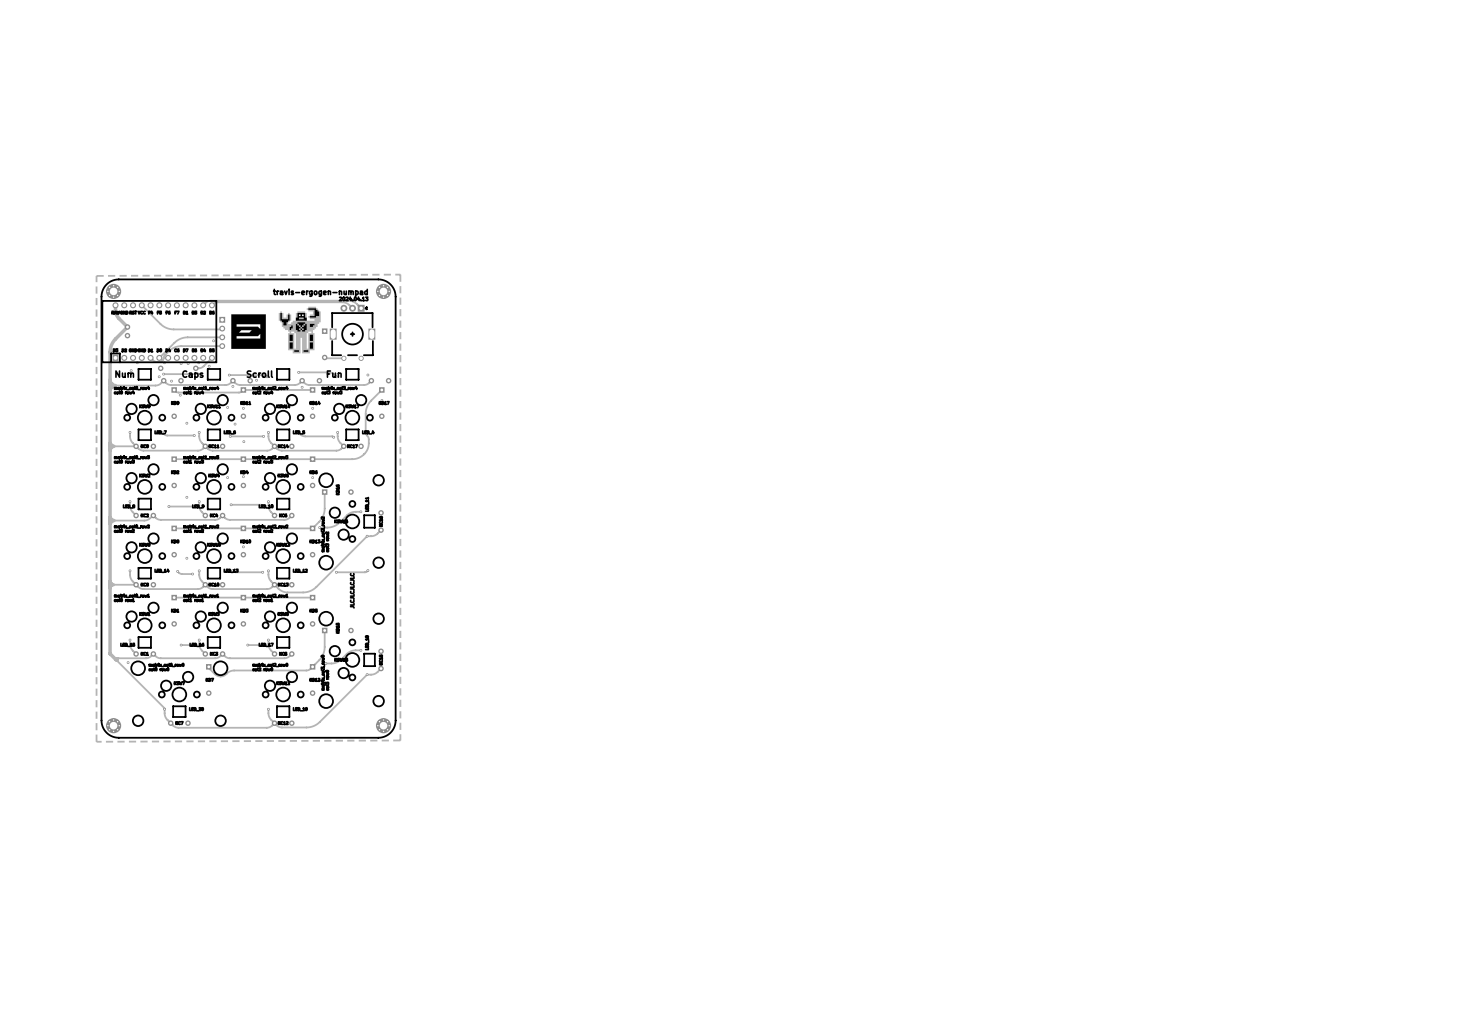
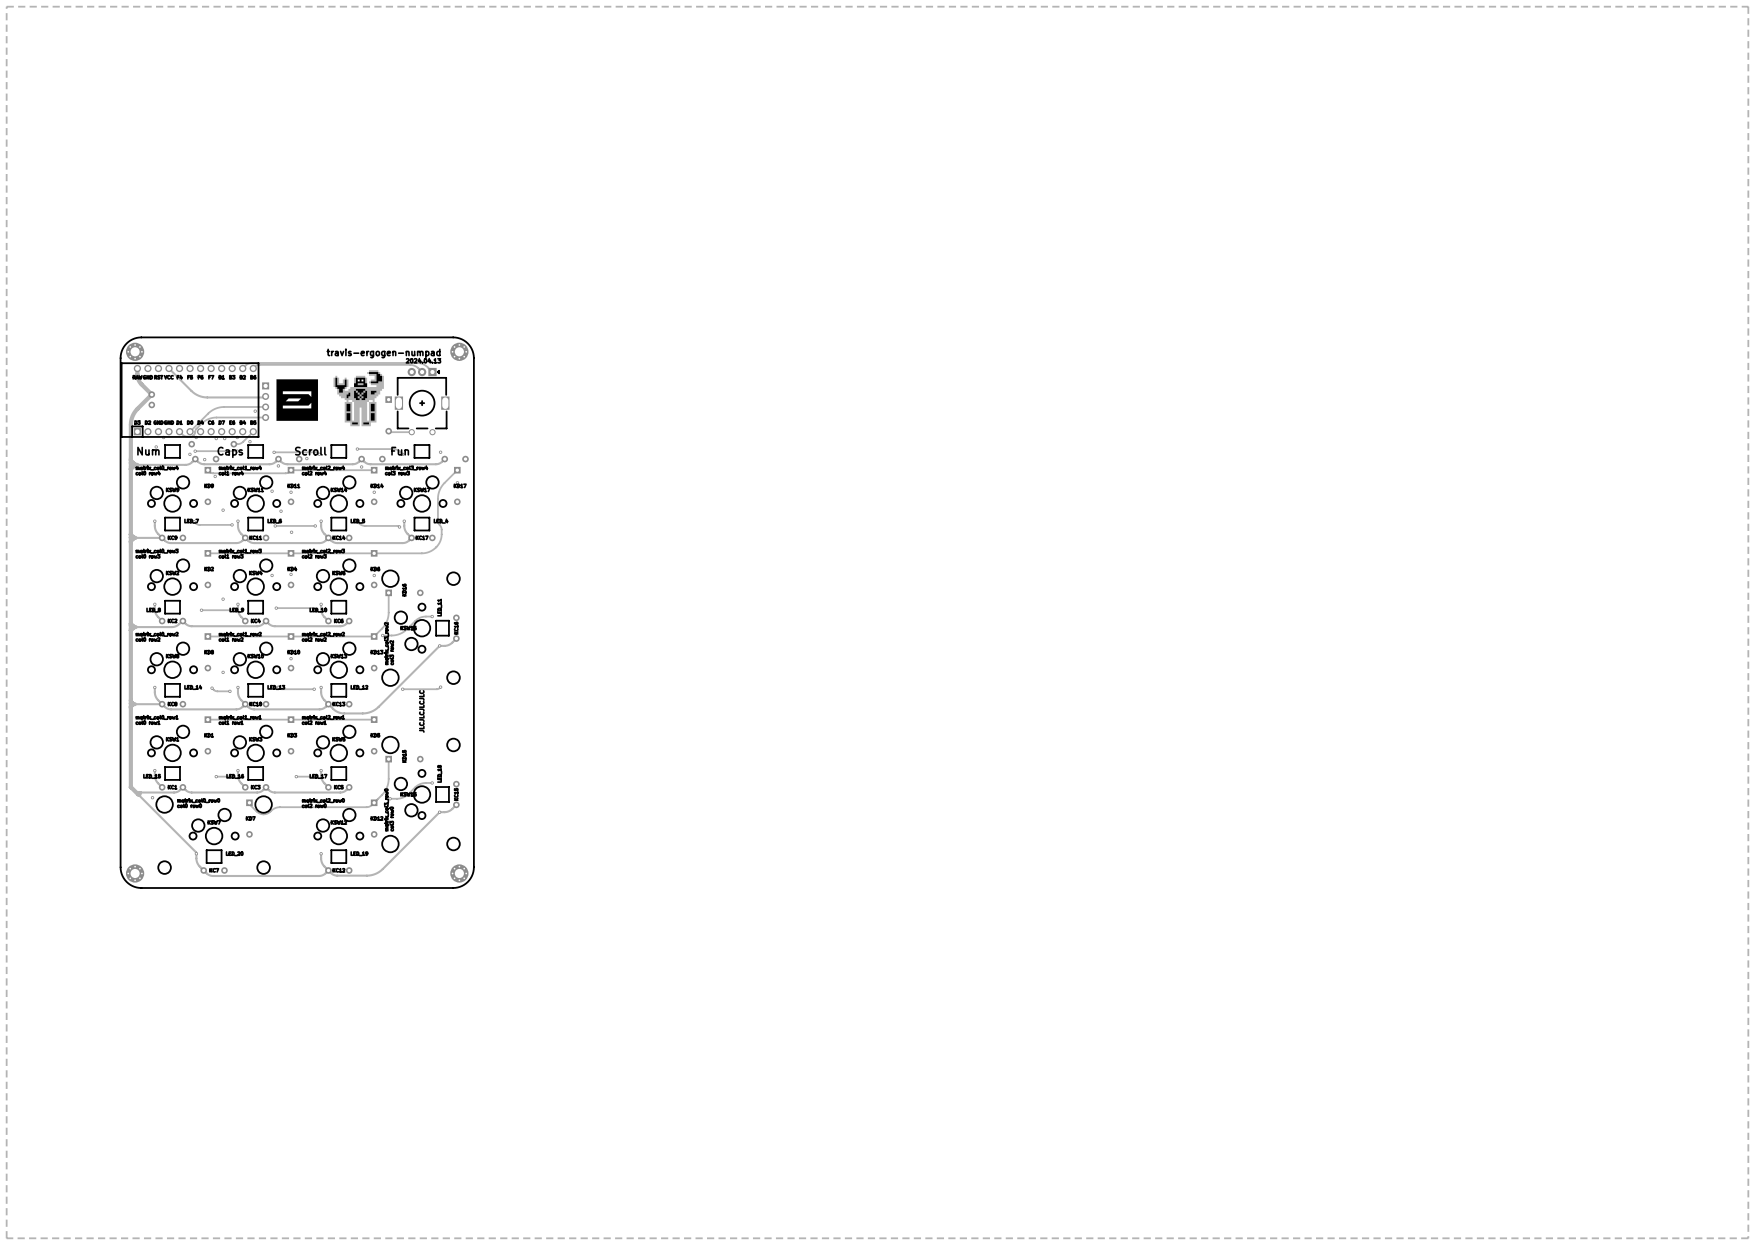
zone outline: none -> (6, 6) (1748, 6) (1748, 1238) (6, 1238) (6, 6)
zone outline: (400, 274) (96, 275) (96, 741) (400, 740) (400, 274) -> none

